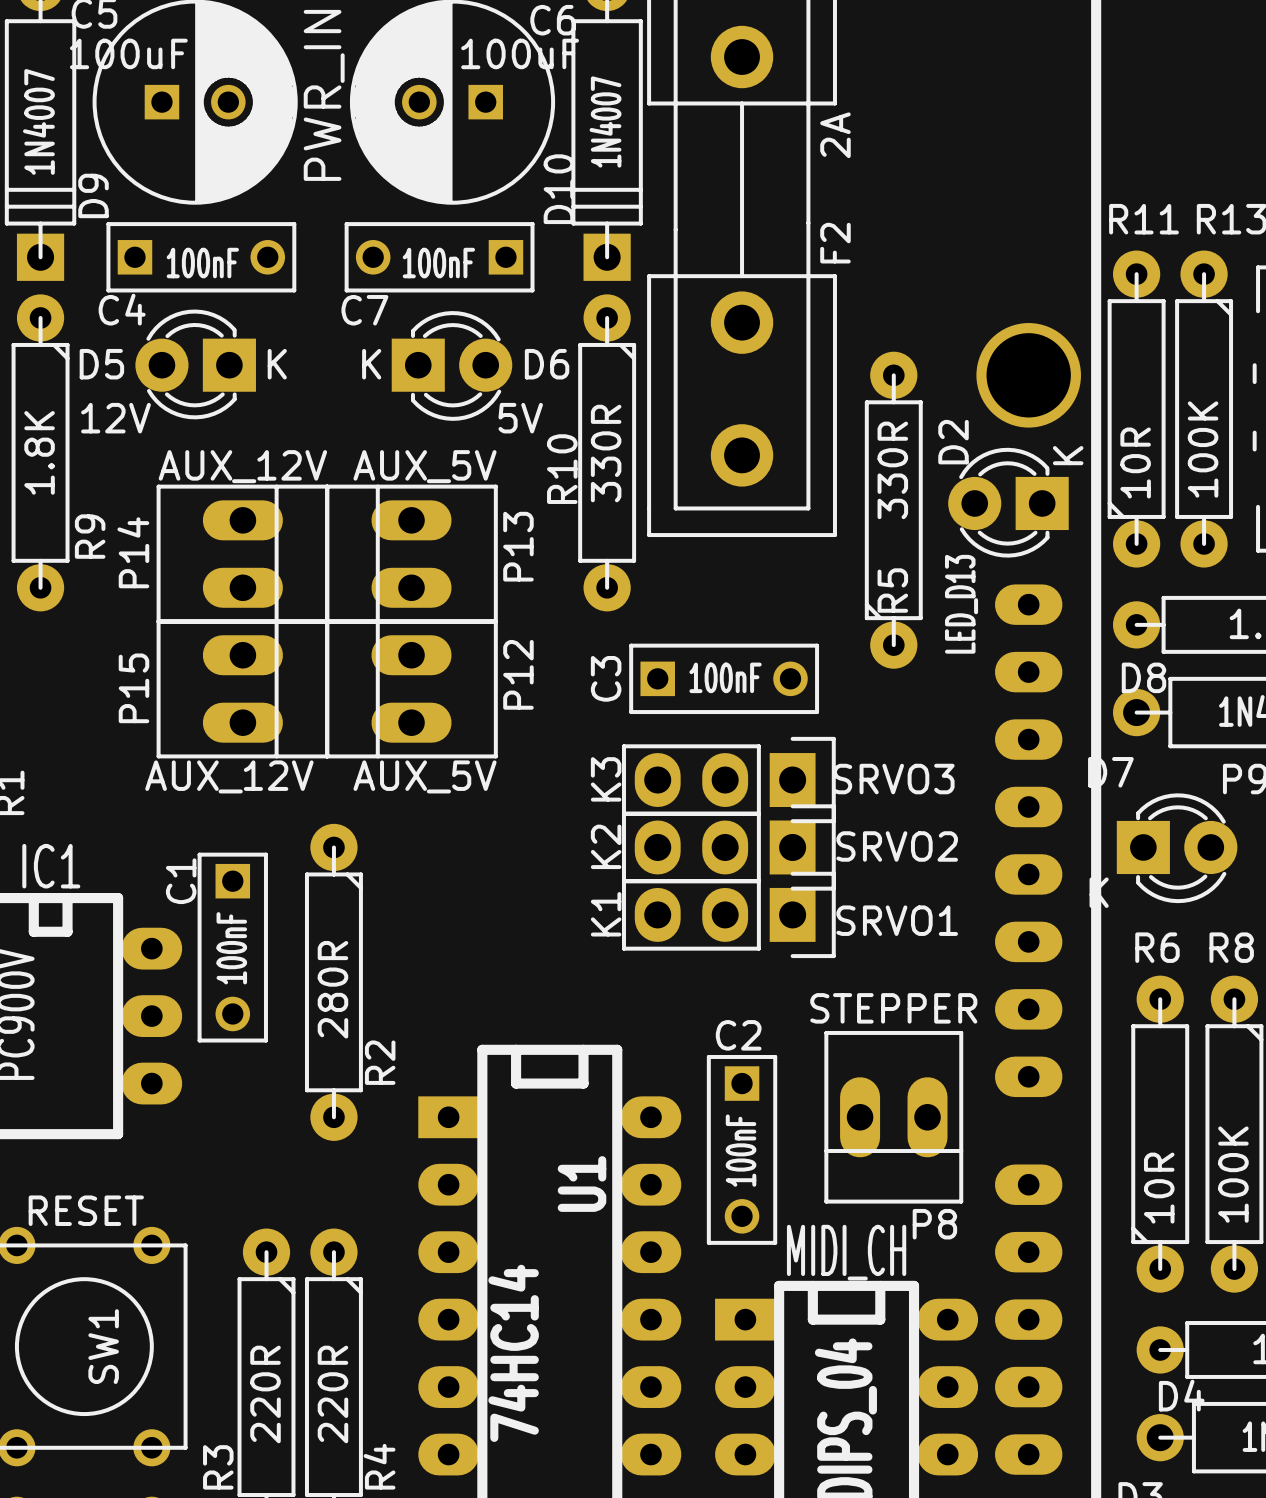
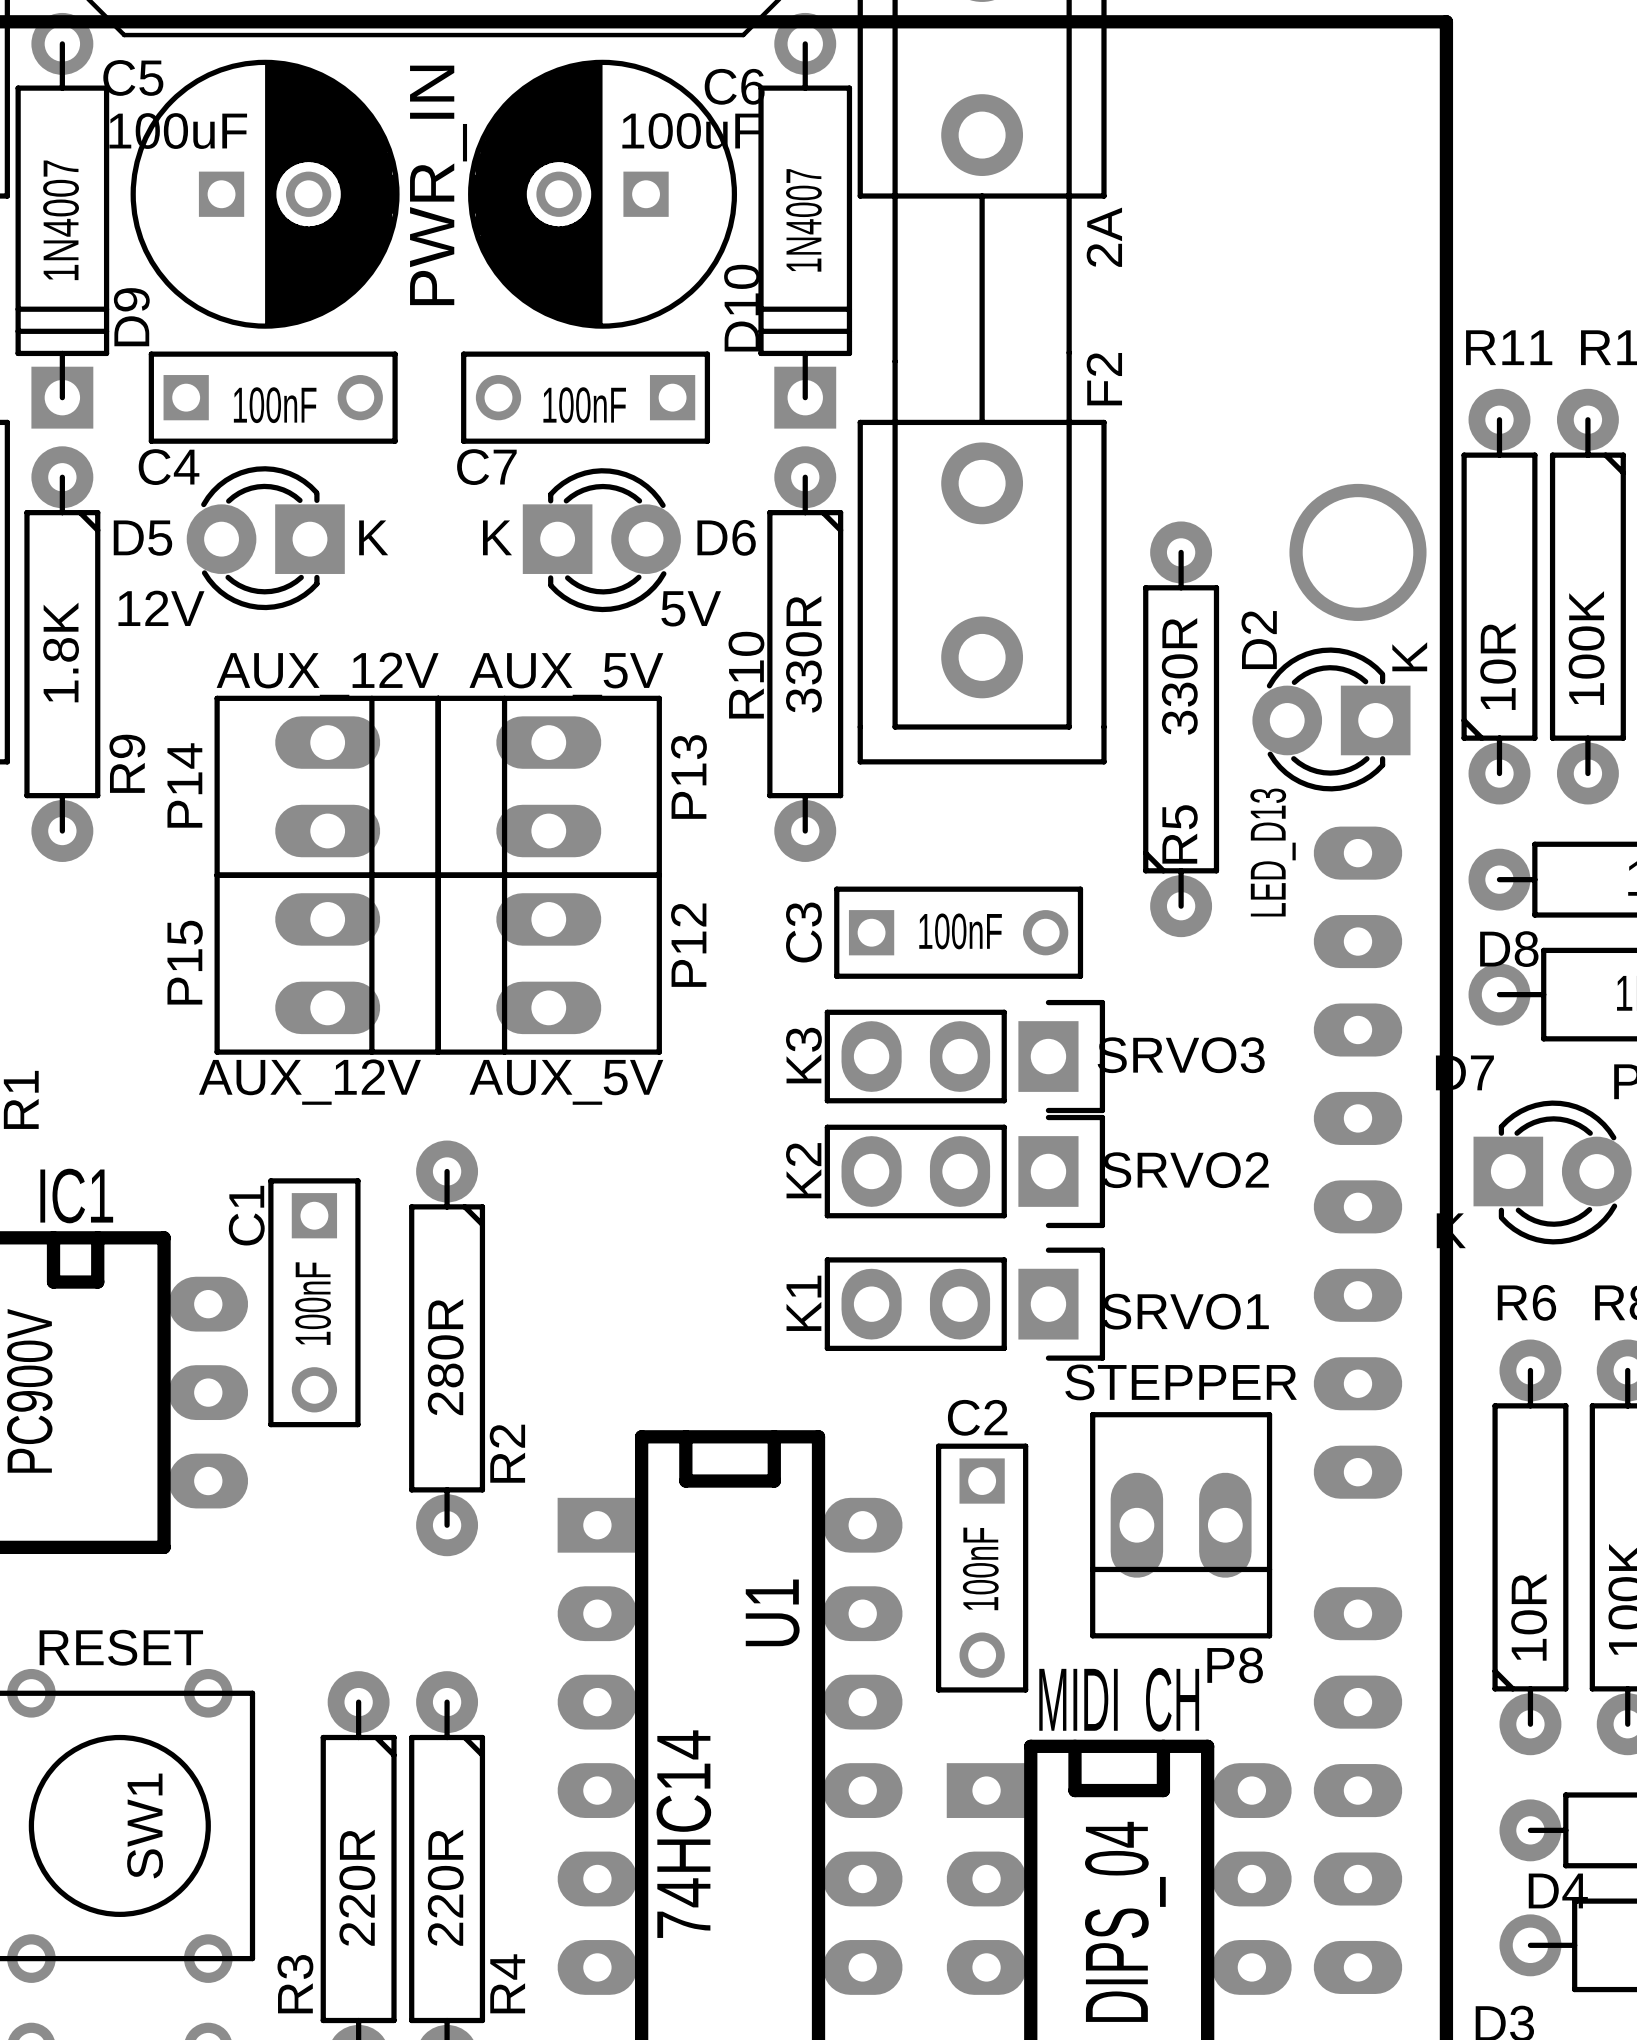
C3 position: (724, 678) -> (958, 932)
K3 position: (728, 780) -> (964, 1056)
K1 position: (728, 914) -> (964, 1304)

